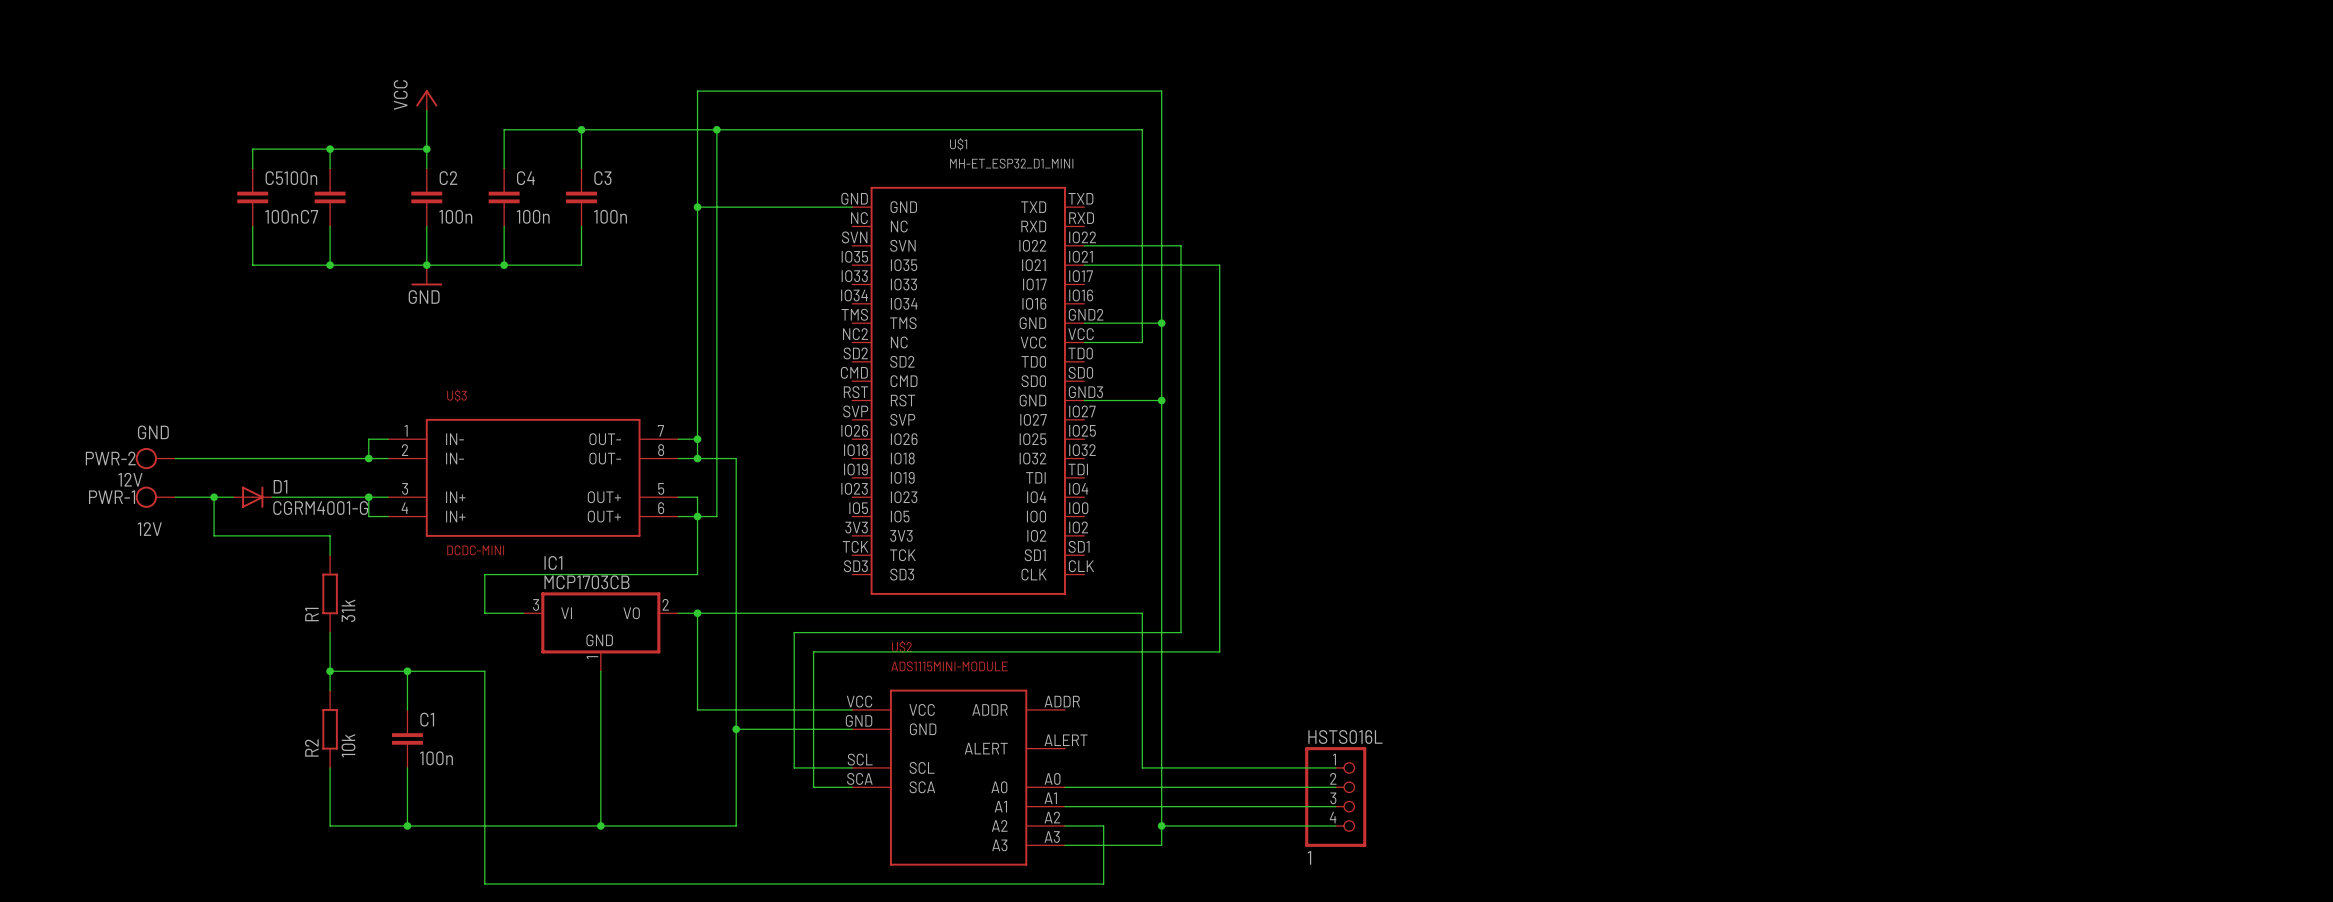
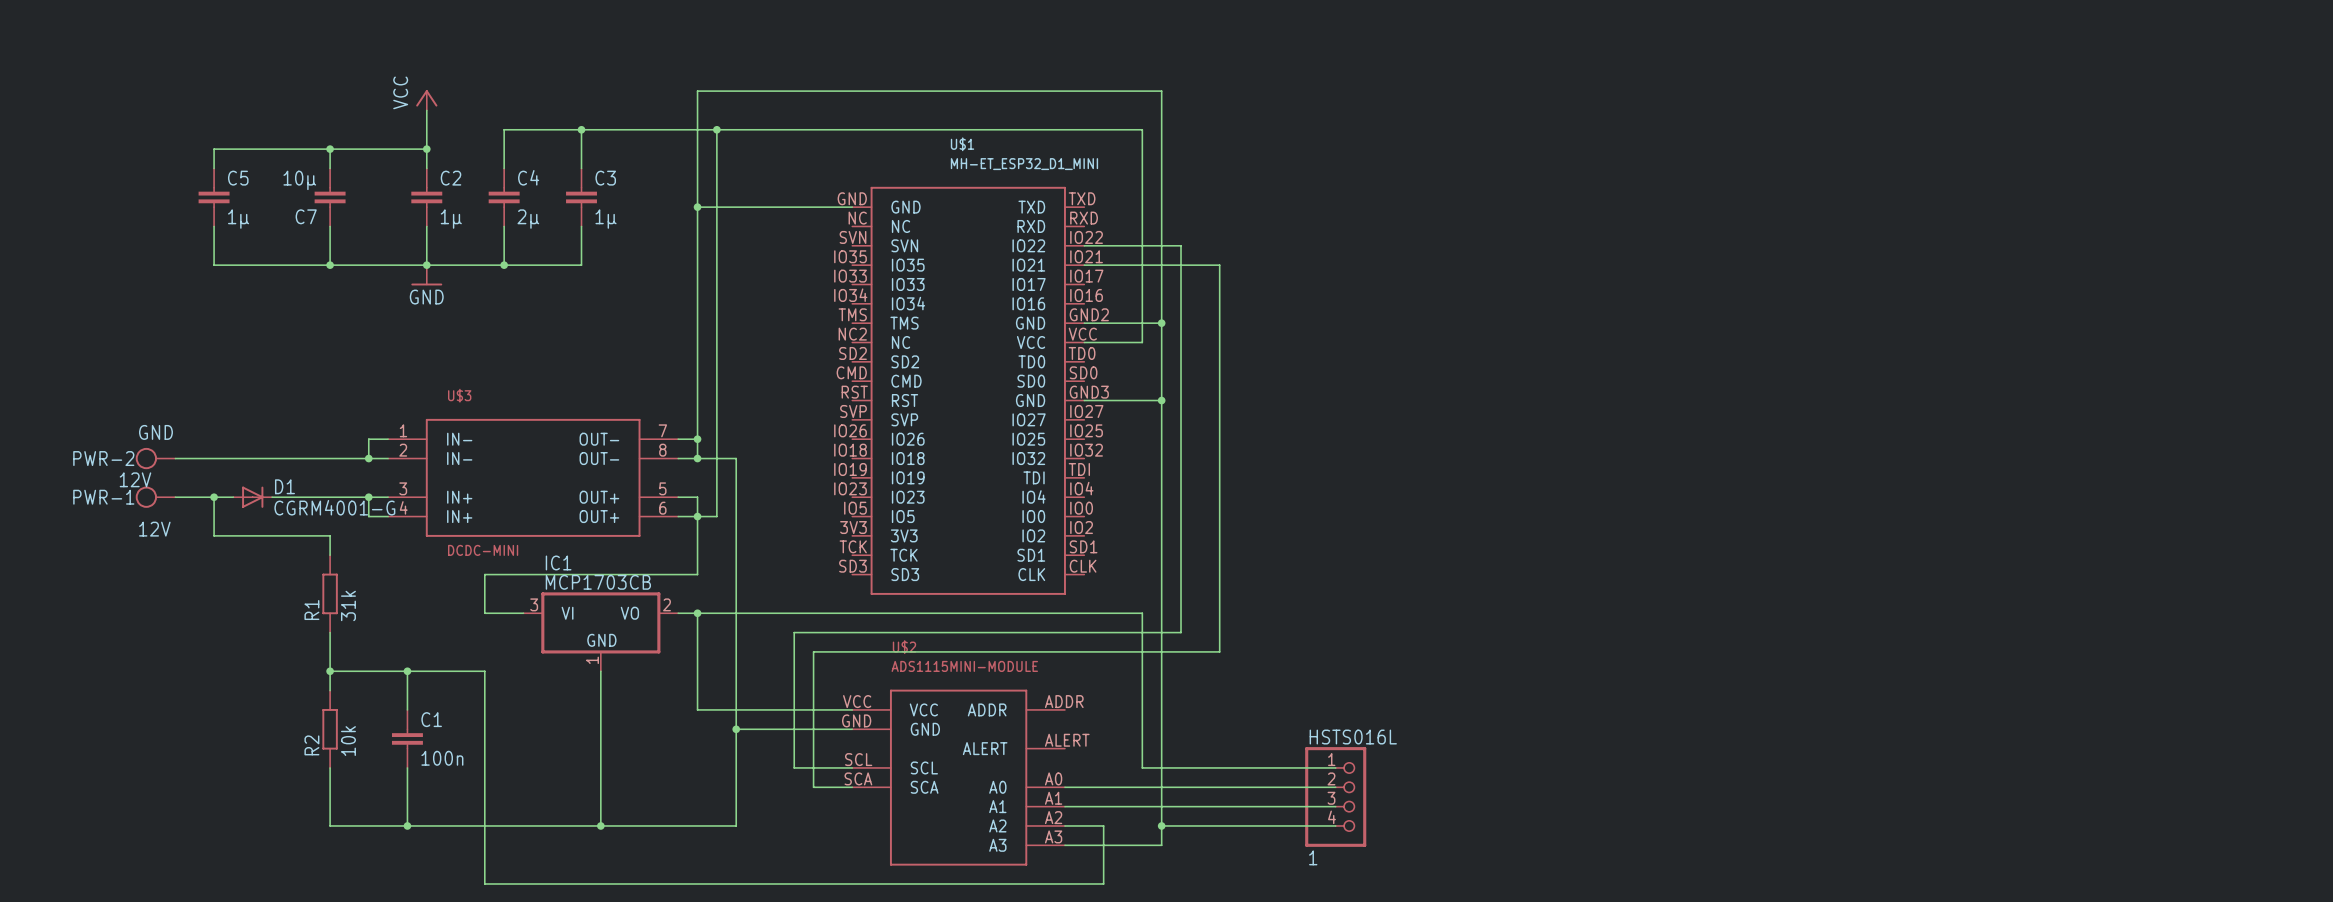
wire: (252, 149) (252, 168) -> (252, 149) (214, 149) (214, 168)
C7 value: 100n (300, 178) -> 10µ (299, 180)
C5 position: (252, 197) -> (214, 197)
C5 value: 100n (281, 216) -> 1µ (238, 219)
C2 value: 100n (455, 216) -> 1µ (451, 219)
C4 value: 100n (533, 216) -> 2µ (528, 219)
C3 value: 100n (610, 216) -> 1µ (606, 219)
wire: (252, 226) (252, 265) -> (214, 226) (214, 265) (252, 265)

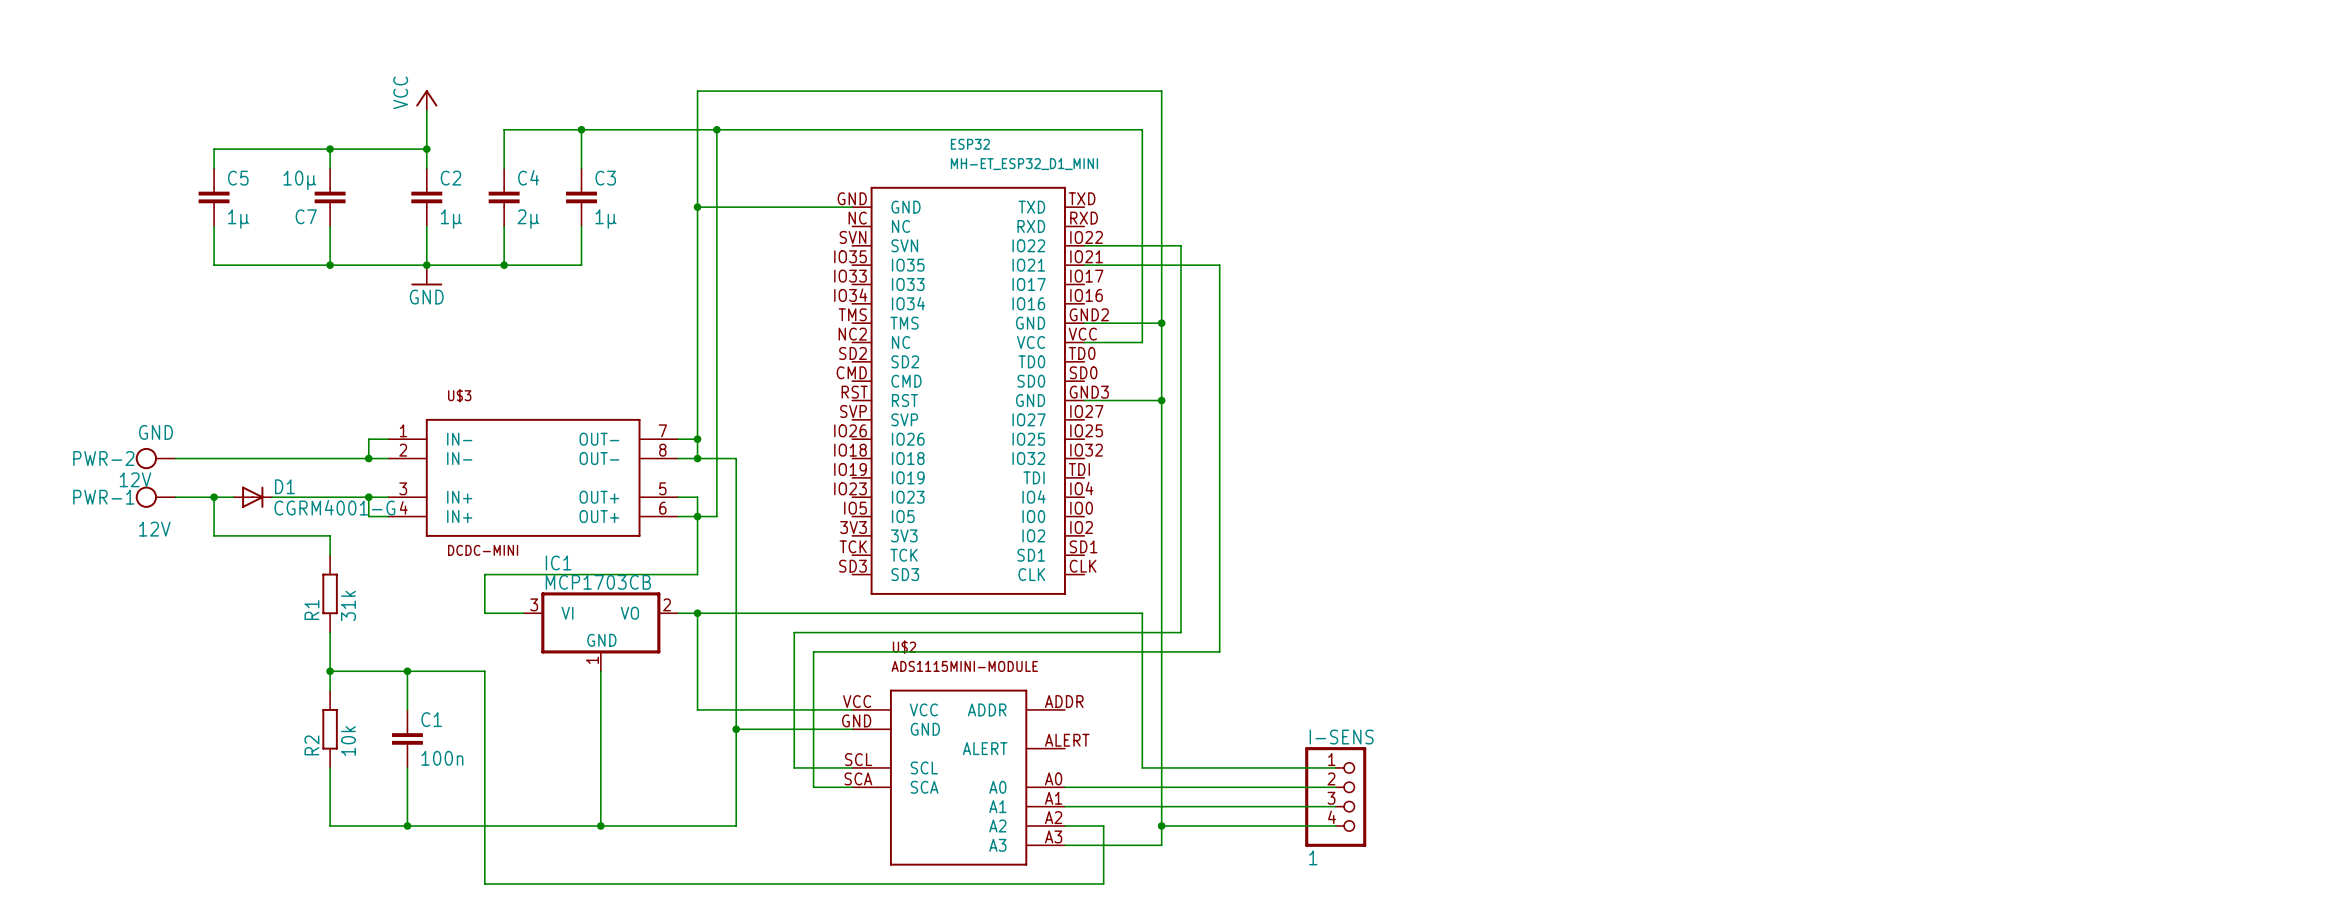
U$1 name: U$1 (962, 144) -> ESP32 (970, 144)
HSTS016L name: HSTS016L (1353, 737) -> I-SENS (1341, 737)

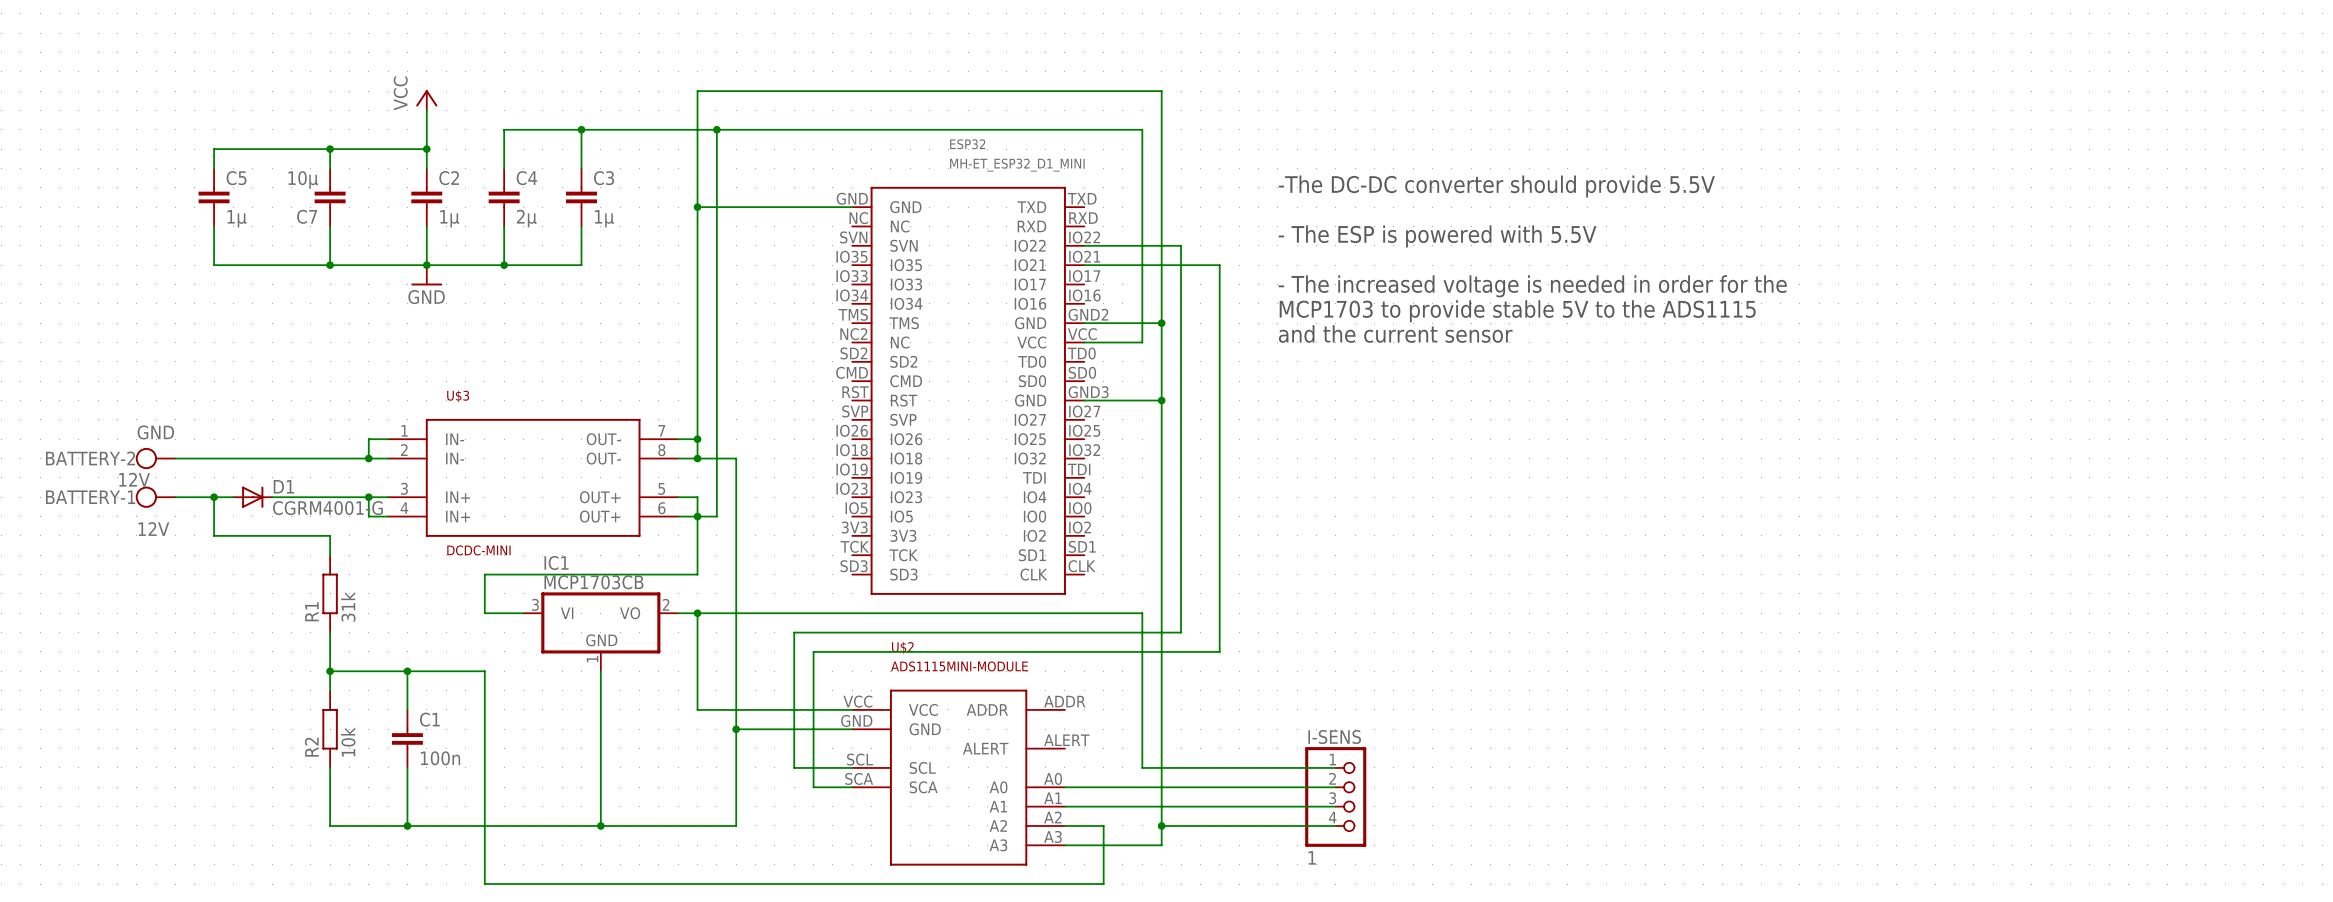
text: none -> -The DC-DC converter should provide 5.5V (1496, 186)
text: none -> - The ESP is powered with 5.5V (1437, 236)
text: none -> - The increased voltage is needed in order for the (1532, 286)
text: none -> MCP1703 to provide stable 5V to the ADS1115 (1517, 311)
text: none -> and the current sensor (1395, 334)
PWR-2 name: PWR-2 (103, 458) -> BATTERY-2 (90, 458)
PWR-1 name: PWR-1 (103, 497) -> BATTERY-1 (90, 497)

